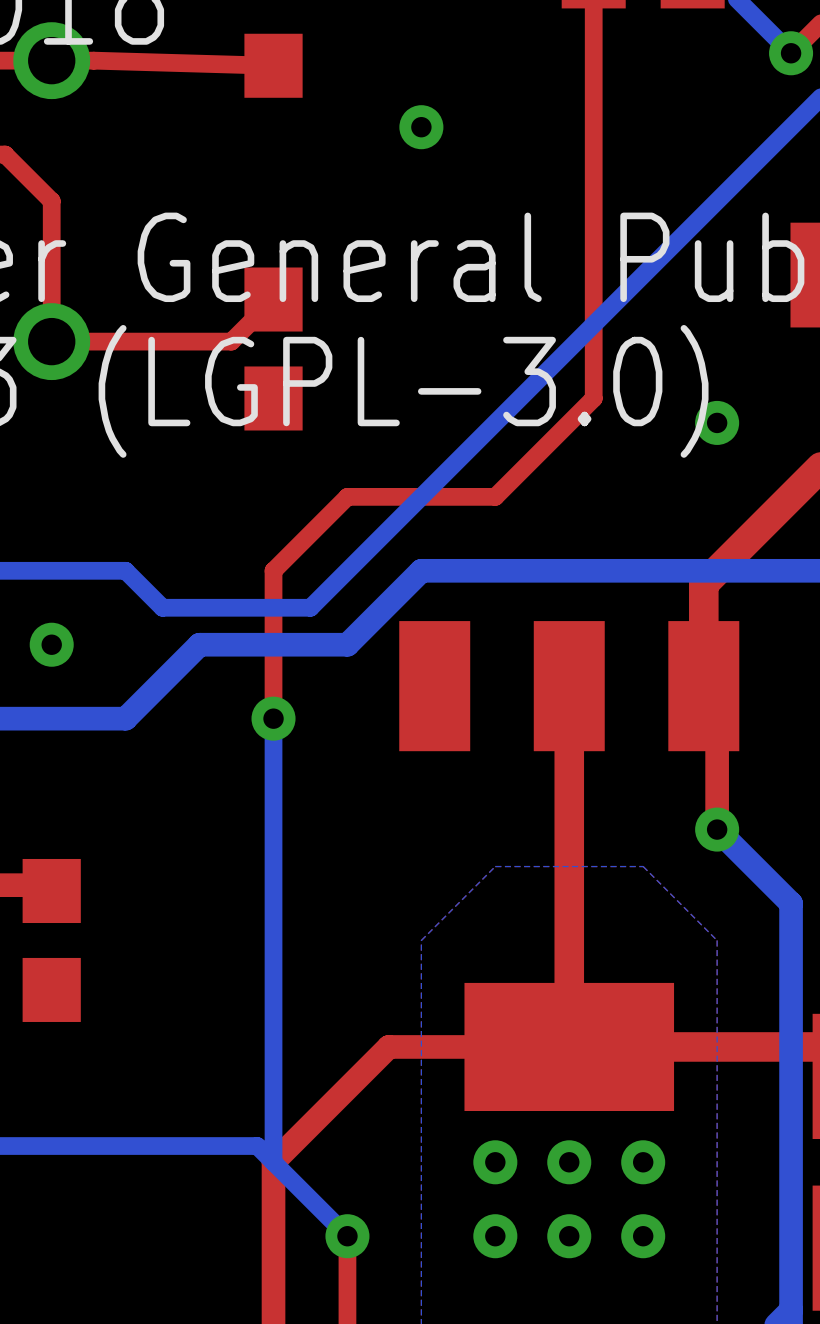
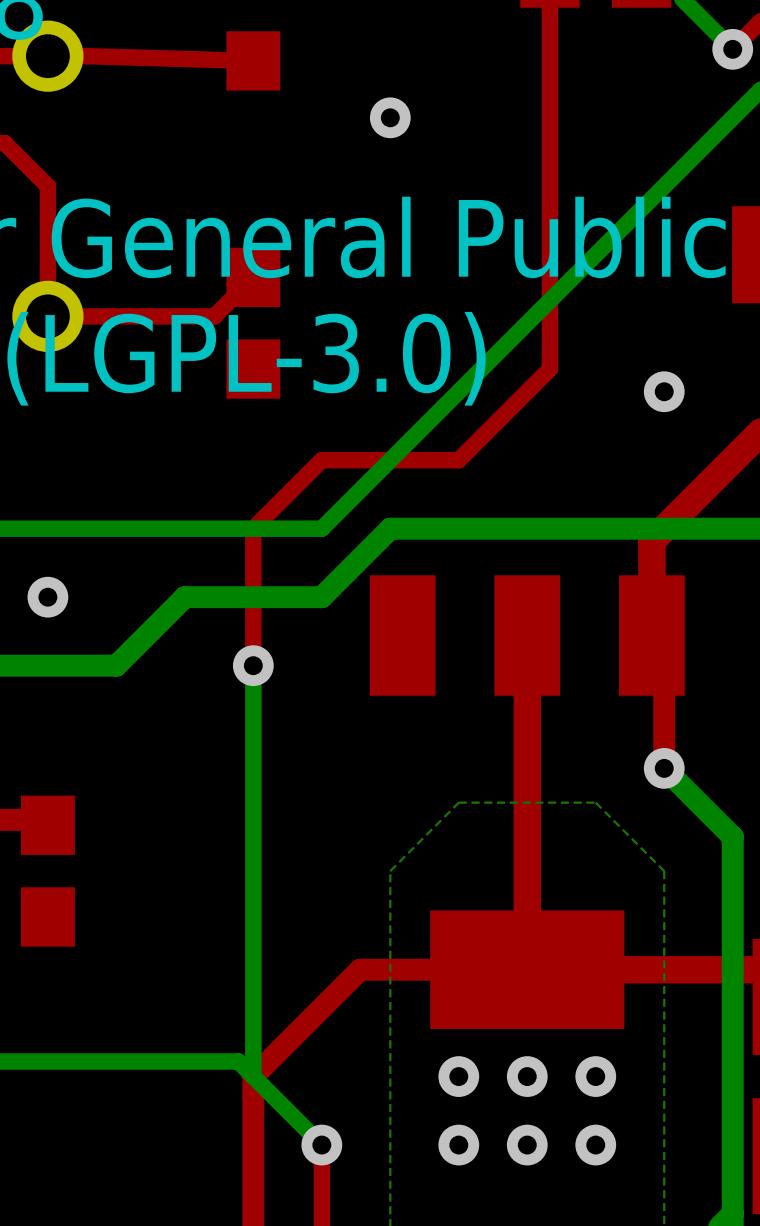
bottom track: (347, 570) (310, 607) (162, 607) (125, 570) -> (321, 528) (116, 528)

